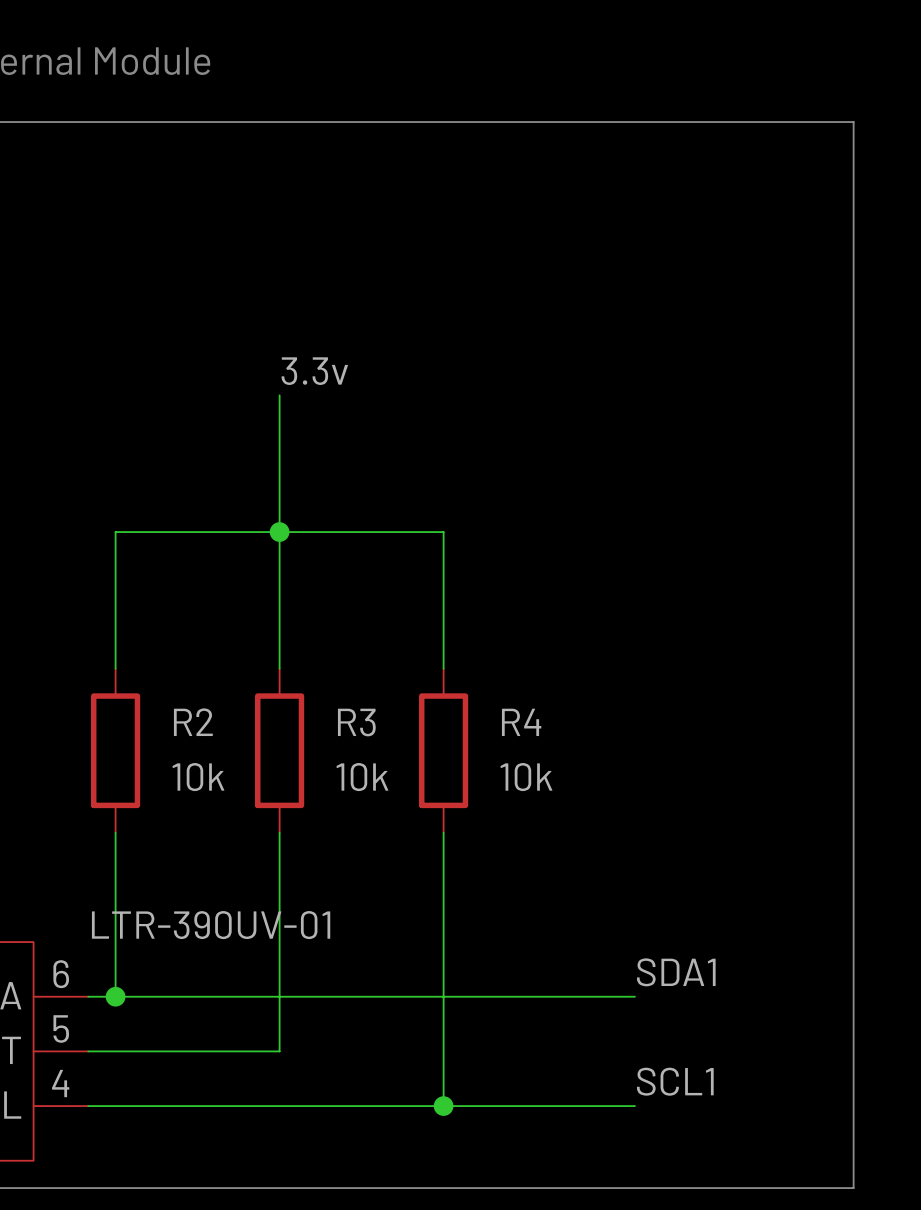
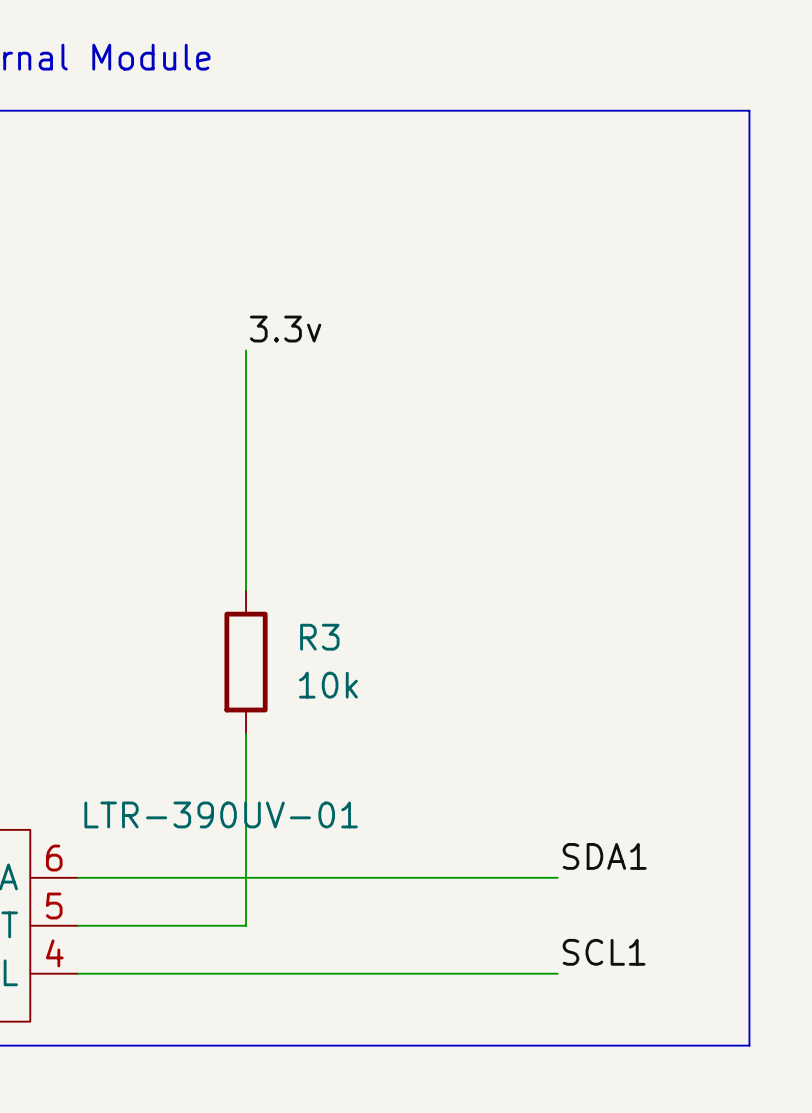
junction: (279, 532) -> none
wire: (115, 668) (115, 532) (443, 532) (443, 668) -> none
R2: 10k (115, 750) -> none
R4: 10k (443, 750) -> none
wire: (115, 832) (115, 996) -> none
wire: (443, 832) (443, 1106) -> none
junction: (115, 996) -> none
junction: (443, 1106) -> none

